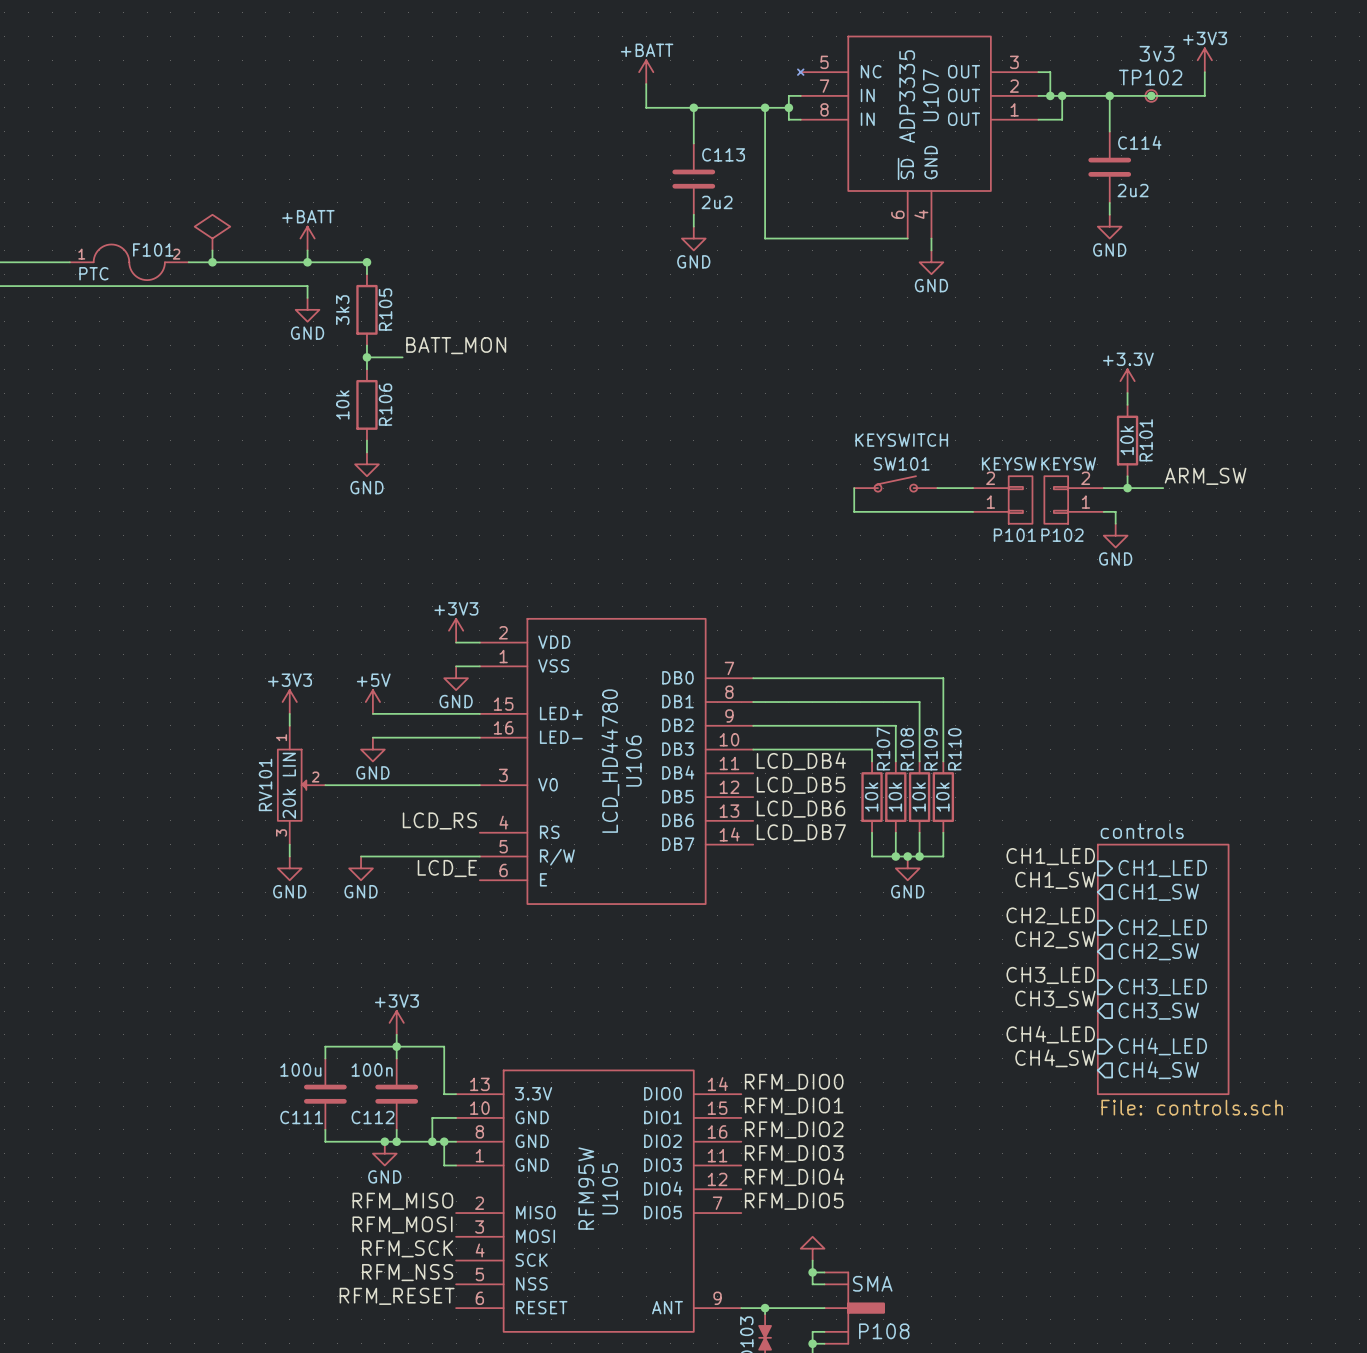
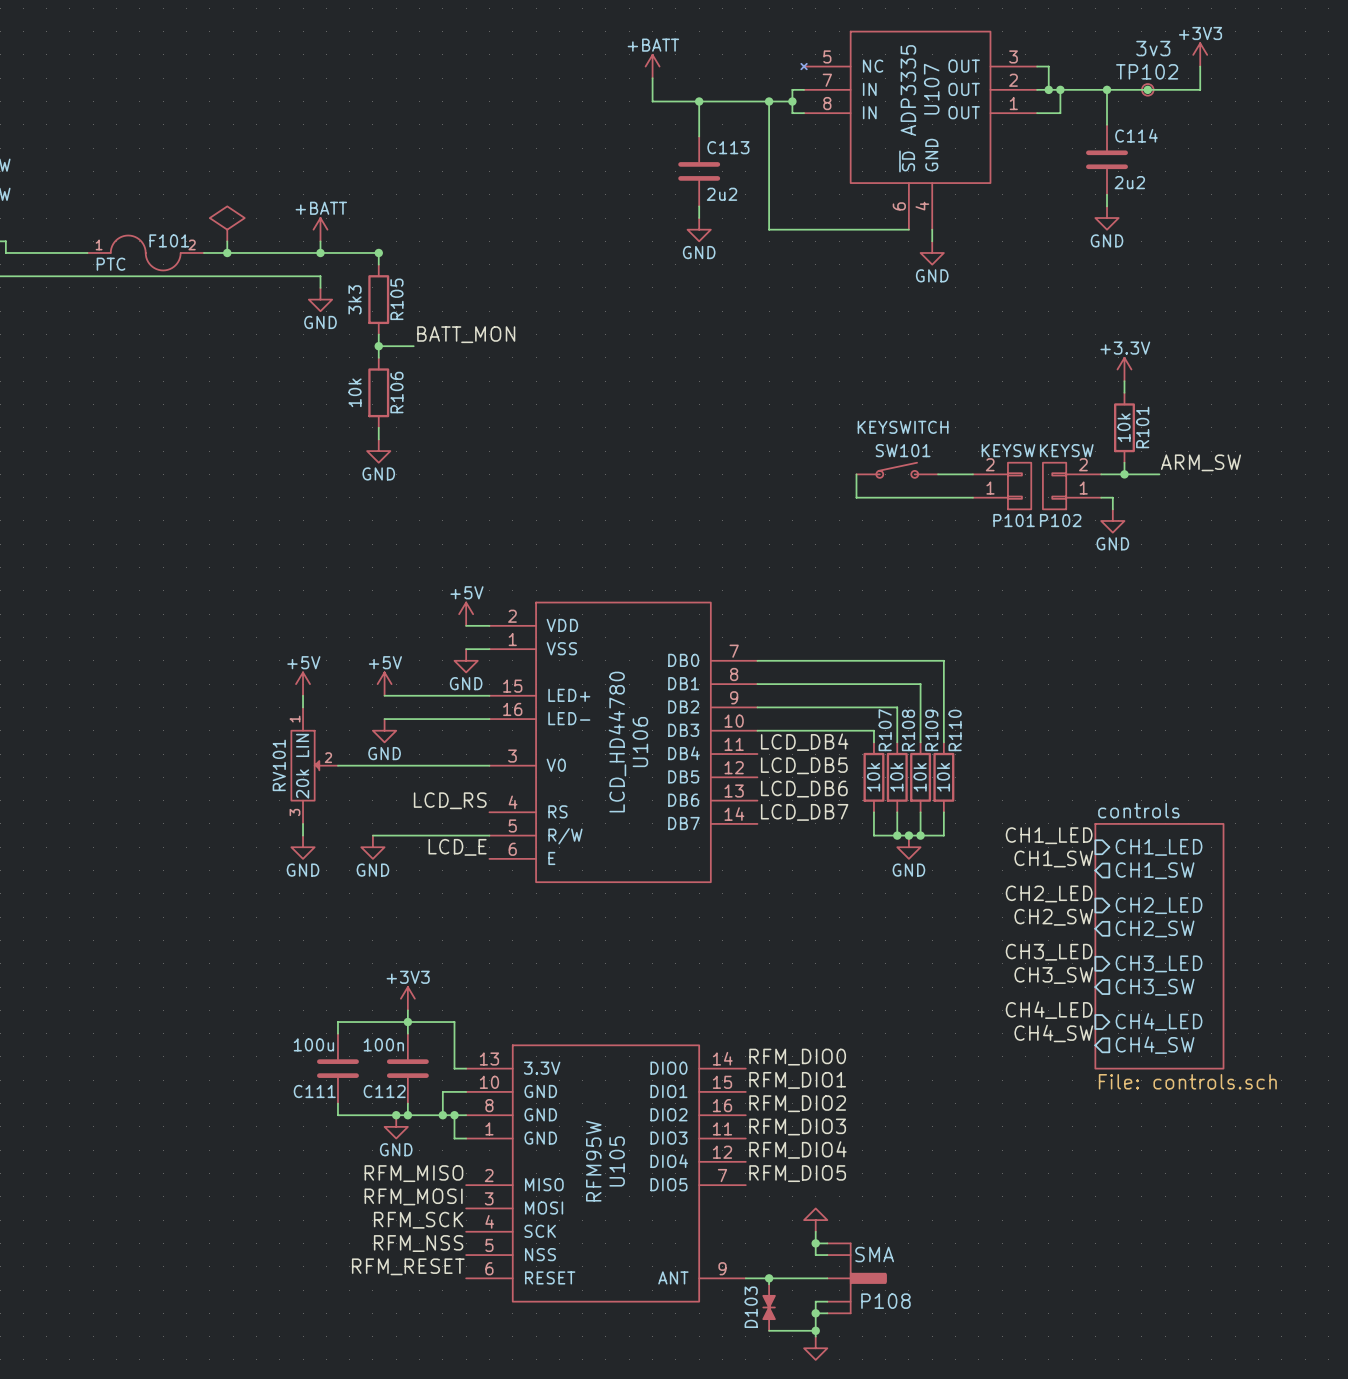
power symbol: +3V3 (456, 630) -> +5V (466, 614)
power symbol: +3V3 (289, 702) -> +5V (303, 684)

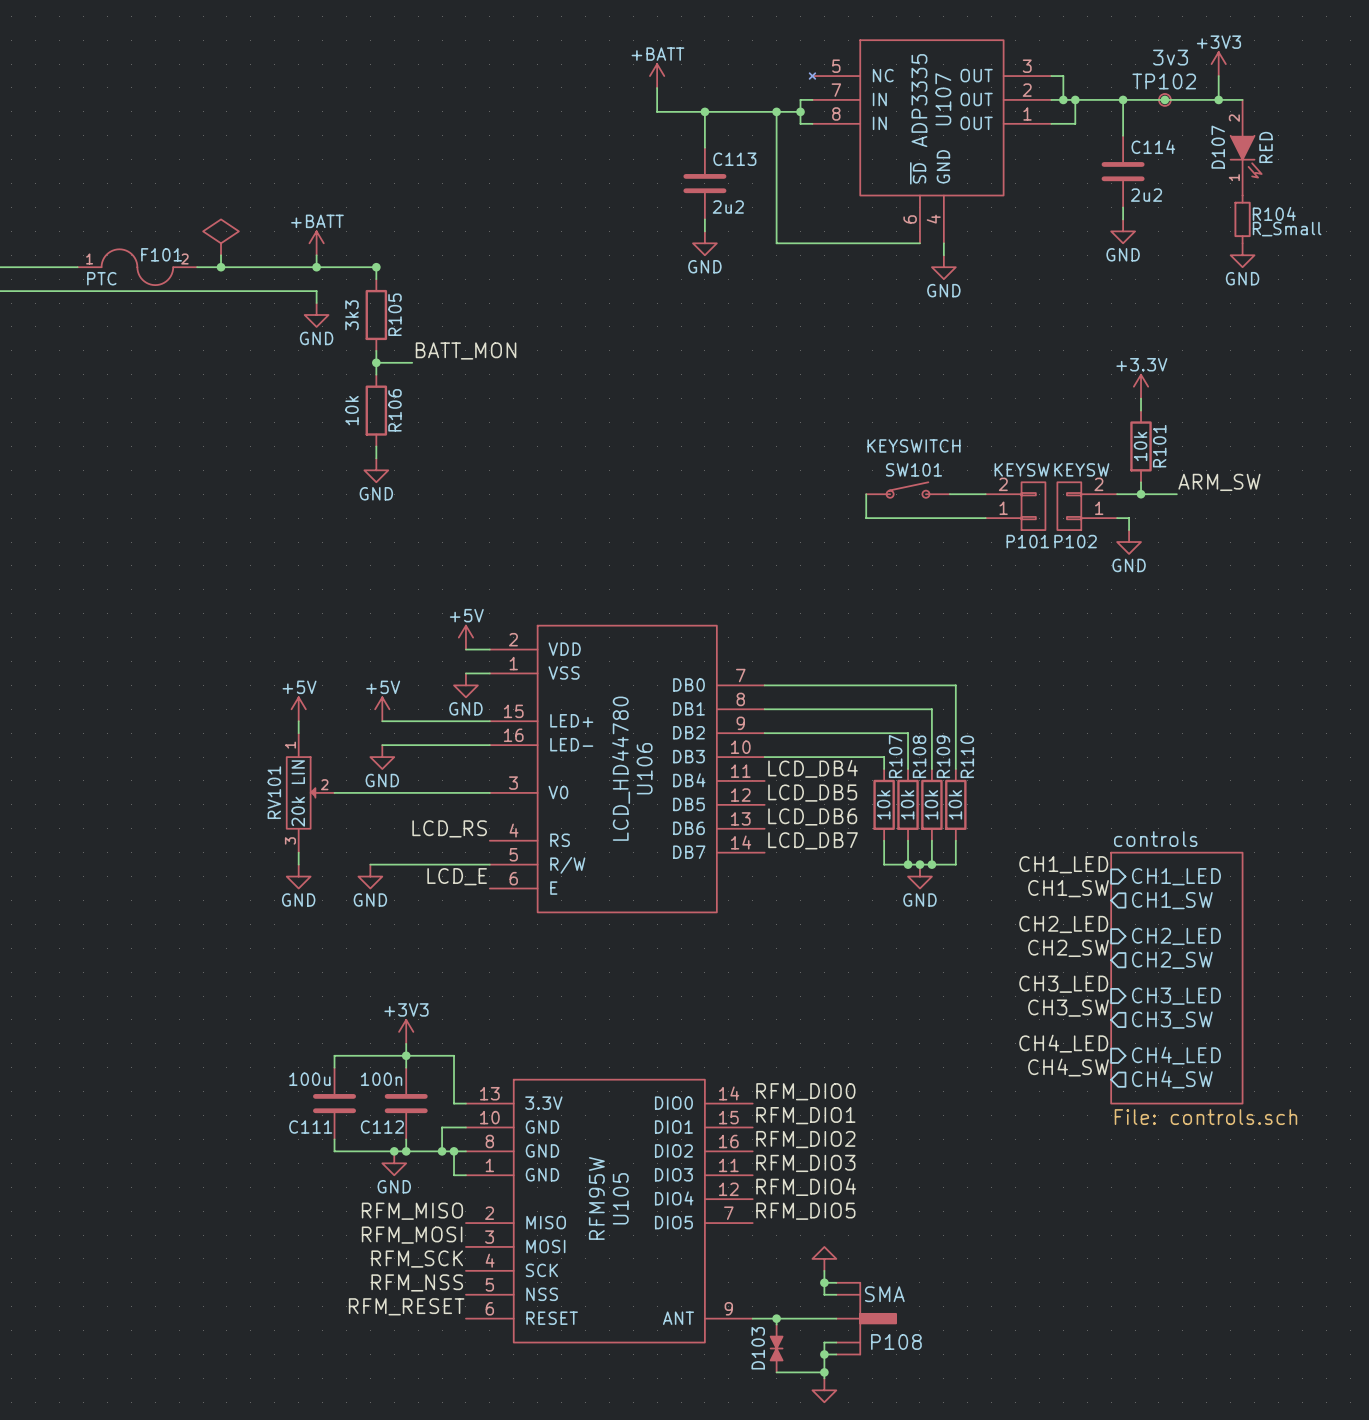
wire: none -> (1218, 99) (1242, 99)
junction: none -> (1218, 99)
D107: none -> RED (1246, 147)
R104: none -> R_Small (1242, 219)
power symbol: none -> GND (1242, 255)

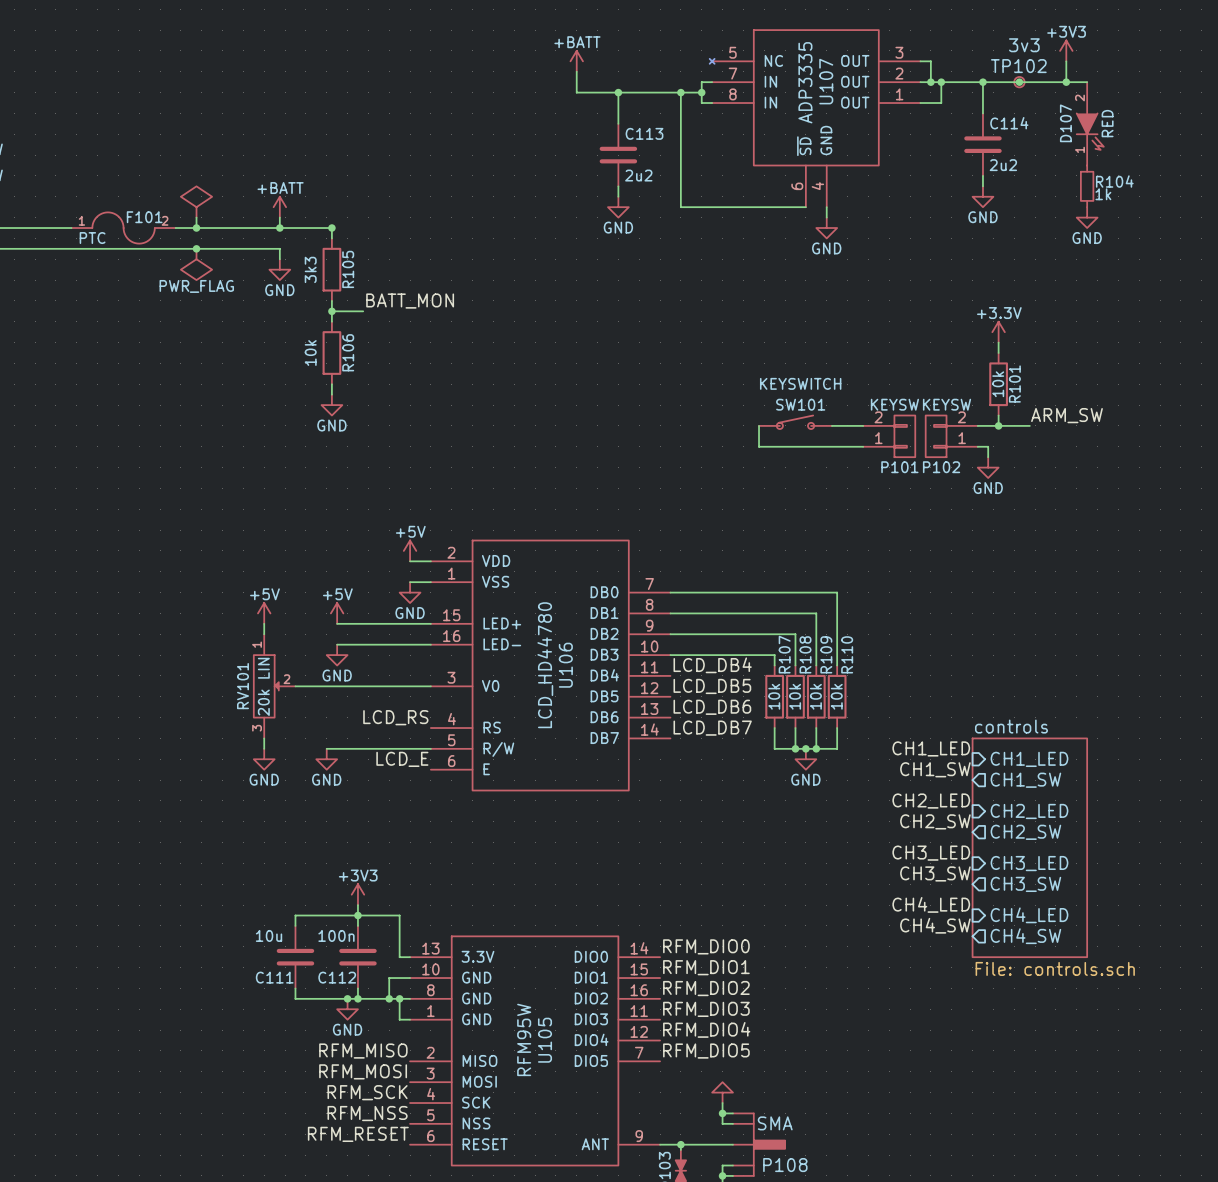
R104 value: R_Small (1287, 229) -> 1k (1103, 194)
junction: none -> (196, 248)
power symbol: none -> PWR_FLAG (196, 264)
C111 value: 100u (309, 1079) -> 10u (269, 935)

